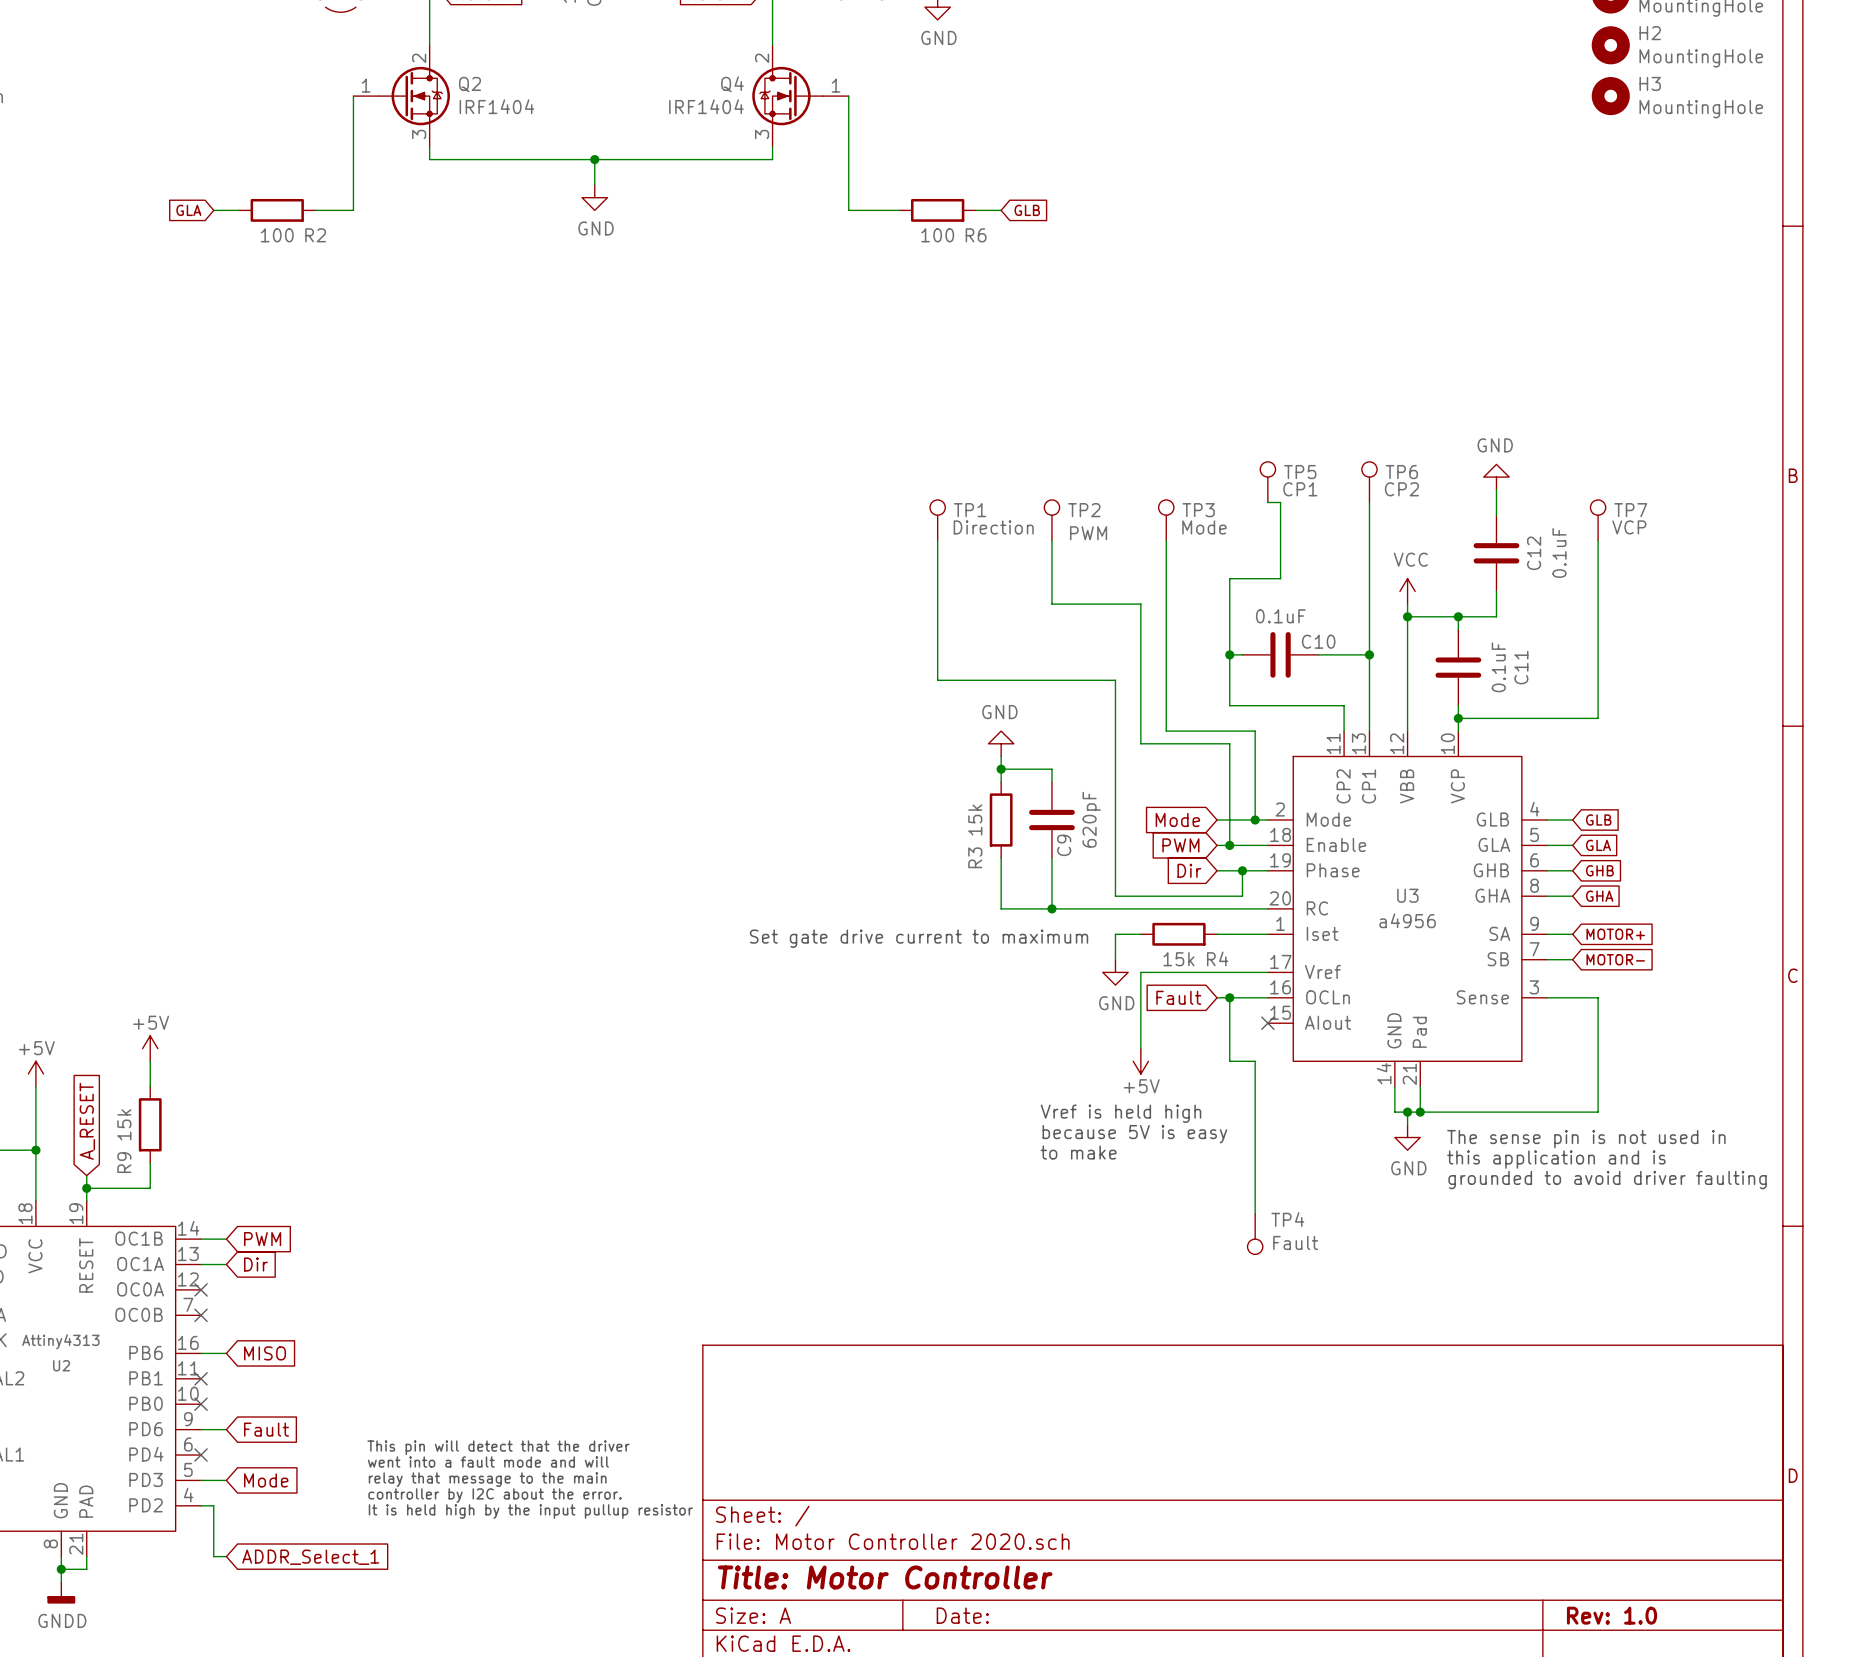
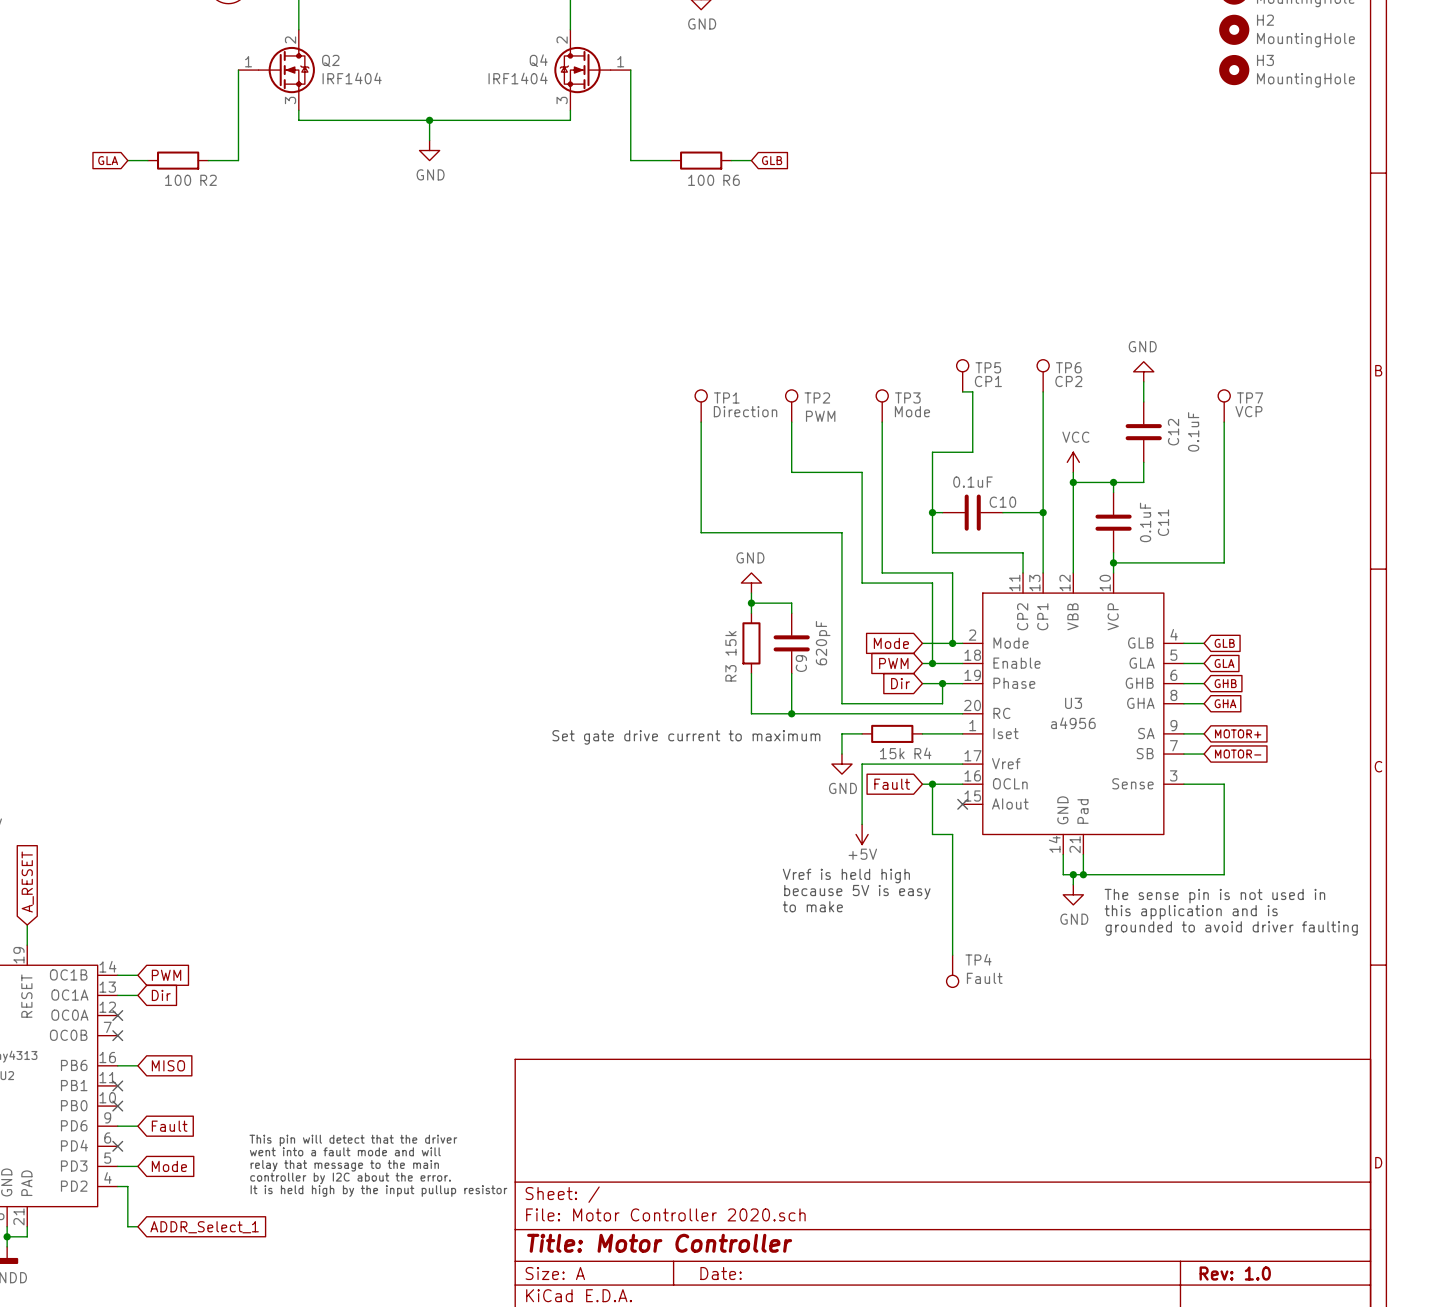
power symbol: +5V (150, 1048) -> none
wire: (150, 1061) (150, 1086) -> none
R9: 15k (150, 1124) -> none
wire: (150, 1162) (150, 1188) (86, 1188) -> none
junction: (86, 1188) -> none

